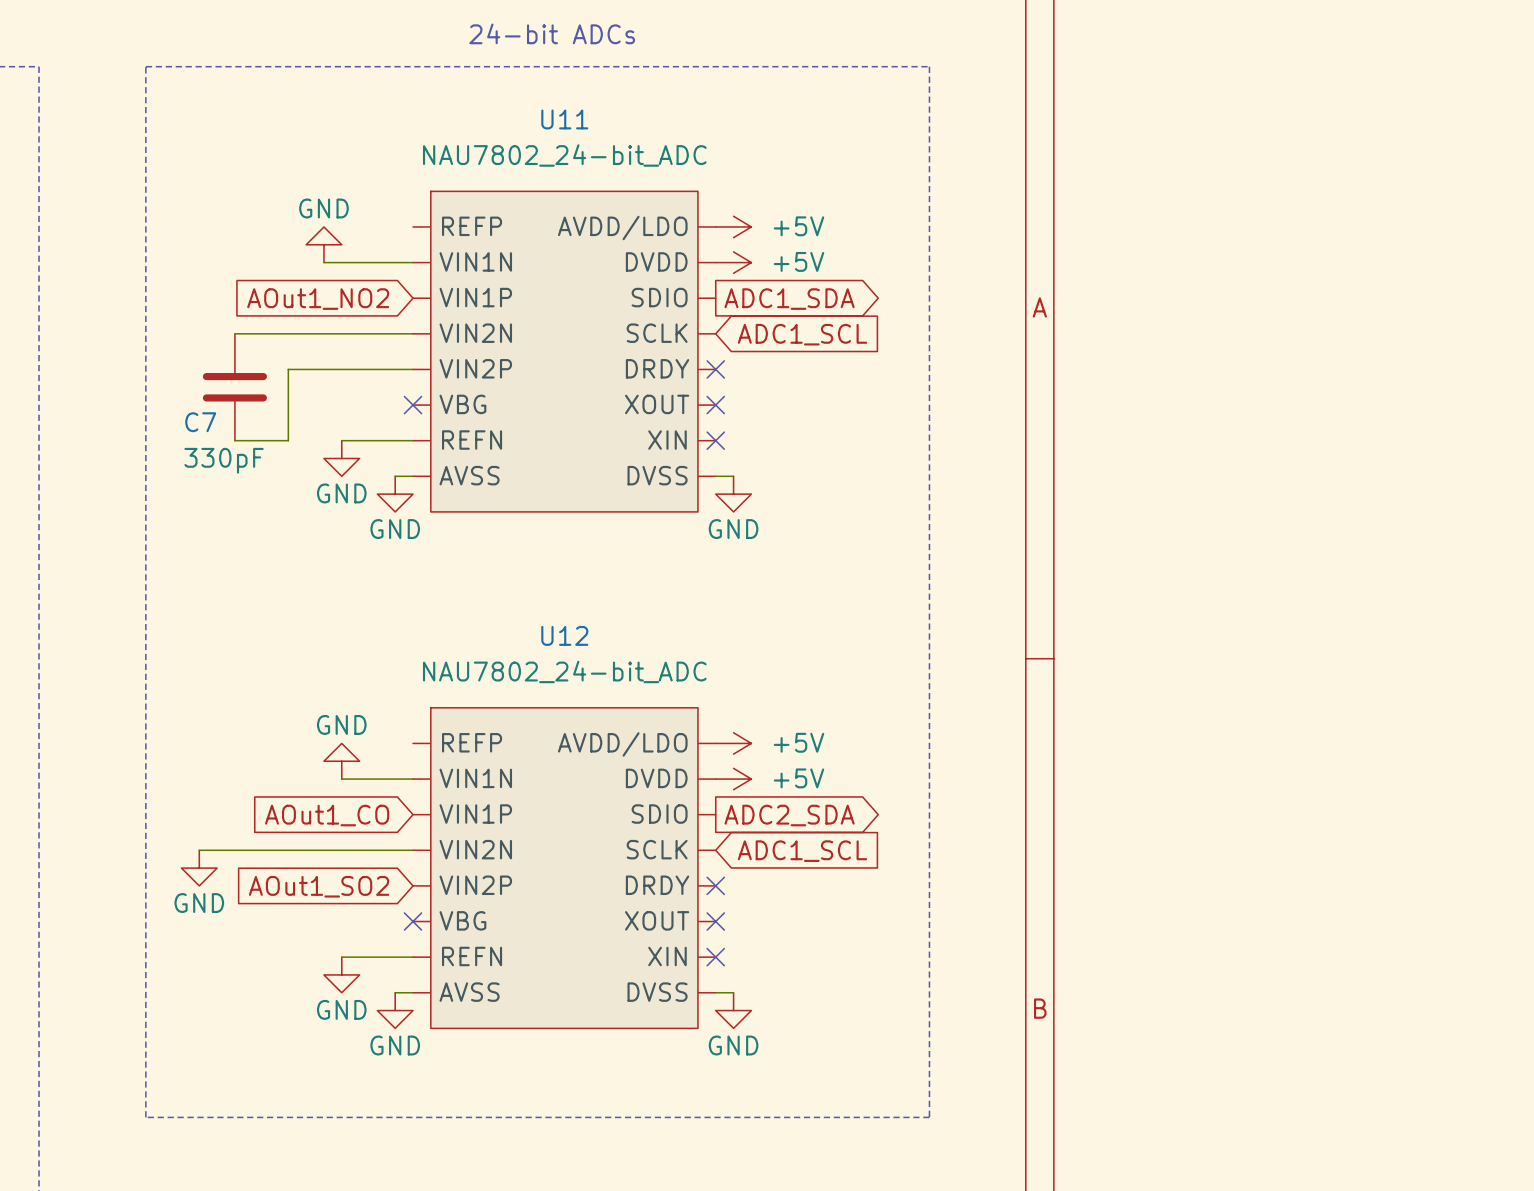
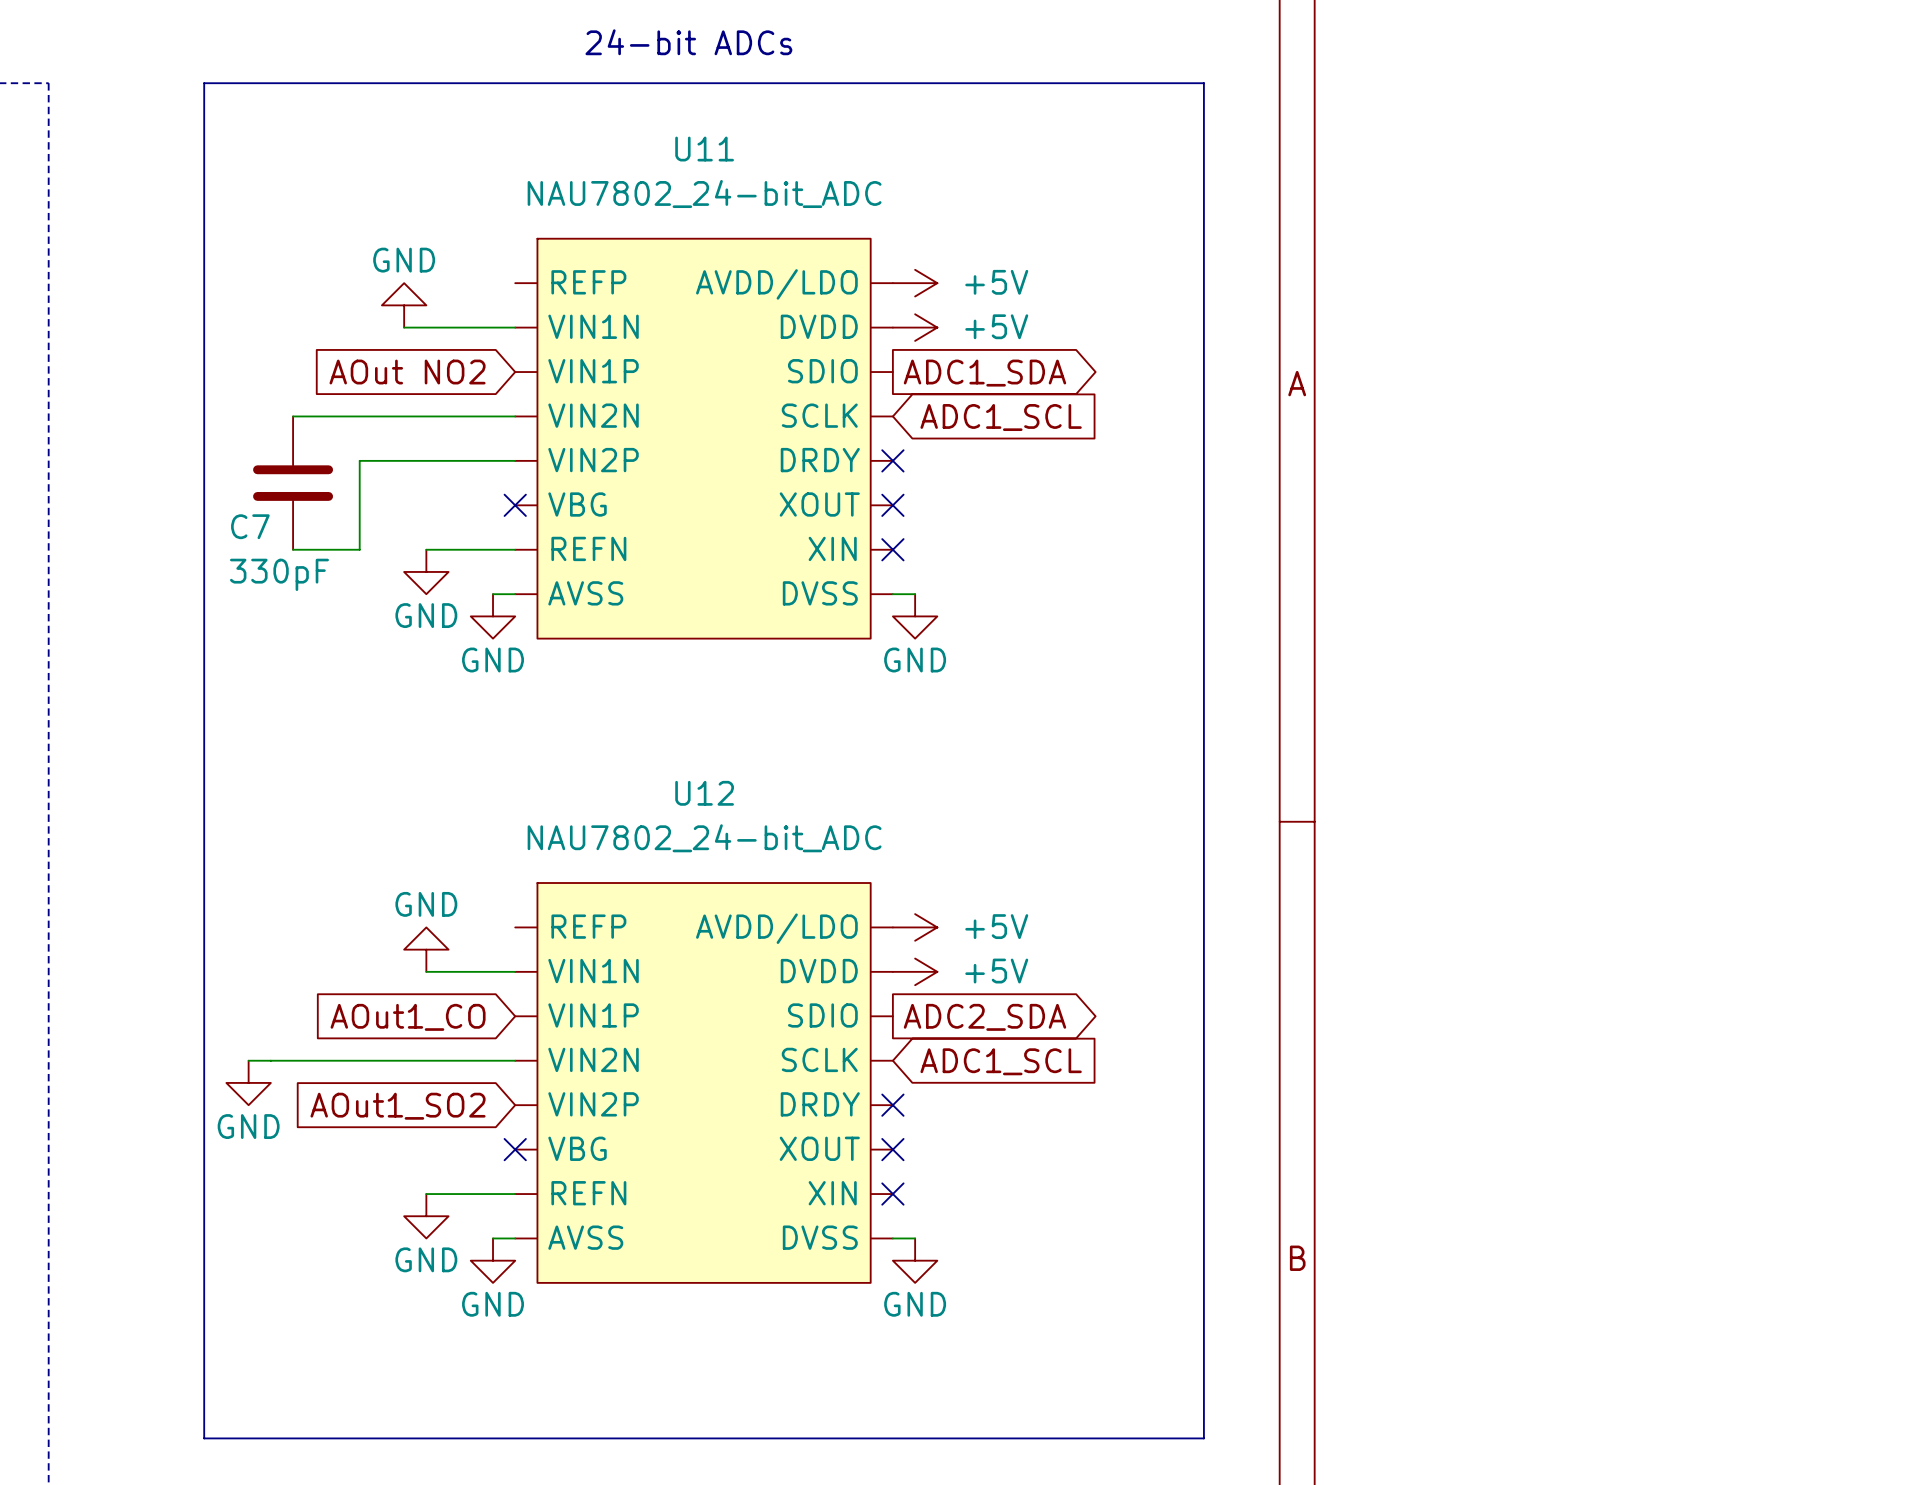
line: (145, 66) (929, 66) (929, 1117) (145, 1117) (145, 66) -> (204, 83) (204, 1438) (1203, 1438) (1203, 83) (204, 83)
global label: AOut1_NO2 (318, 299) -> AOut NO2 (407, 372)

